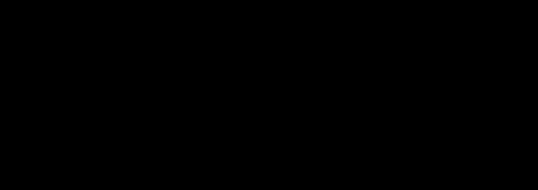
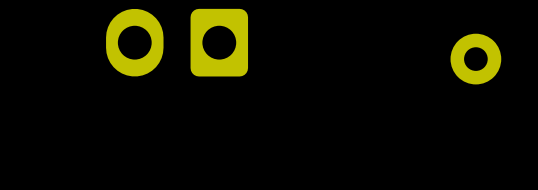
part: none -> (177, 42)
part: none -> (475, 59)

